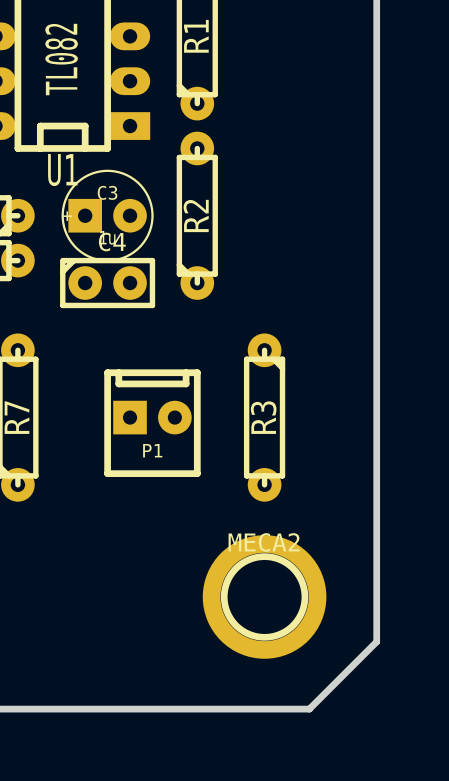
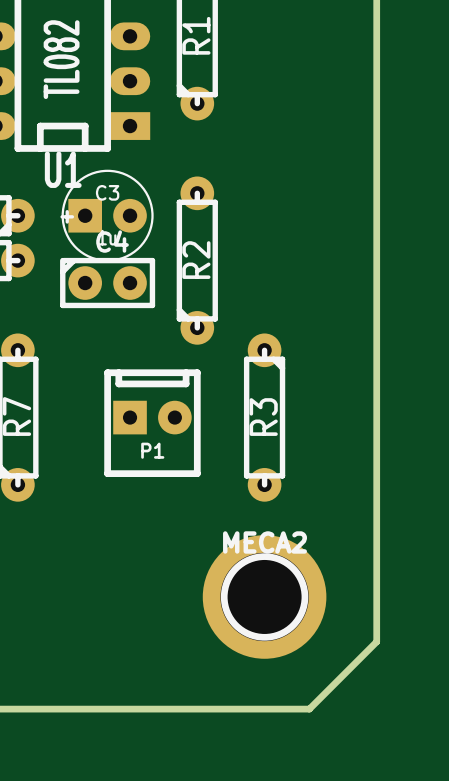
R2 position: (197, 215) -> (197, 260)

